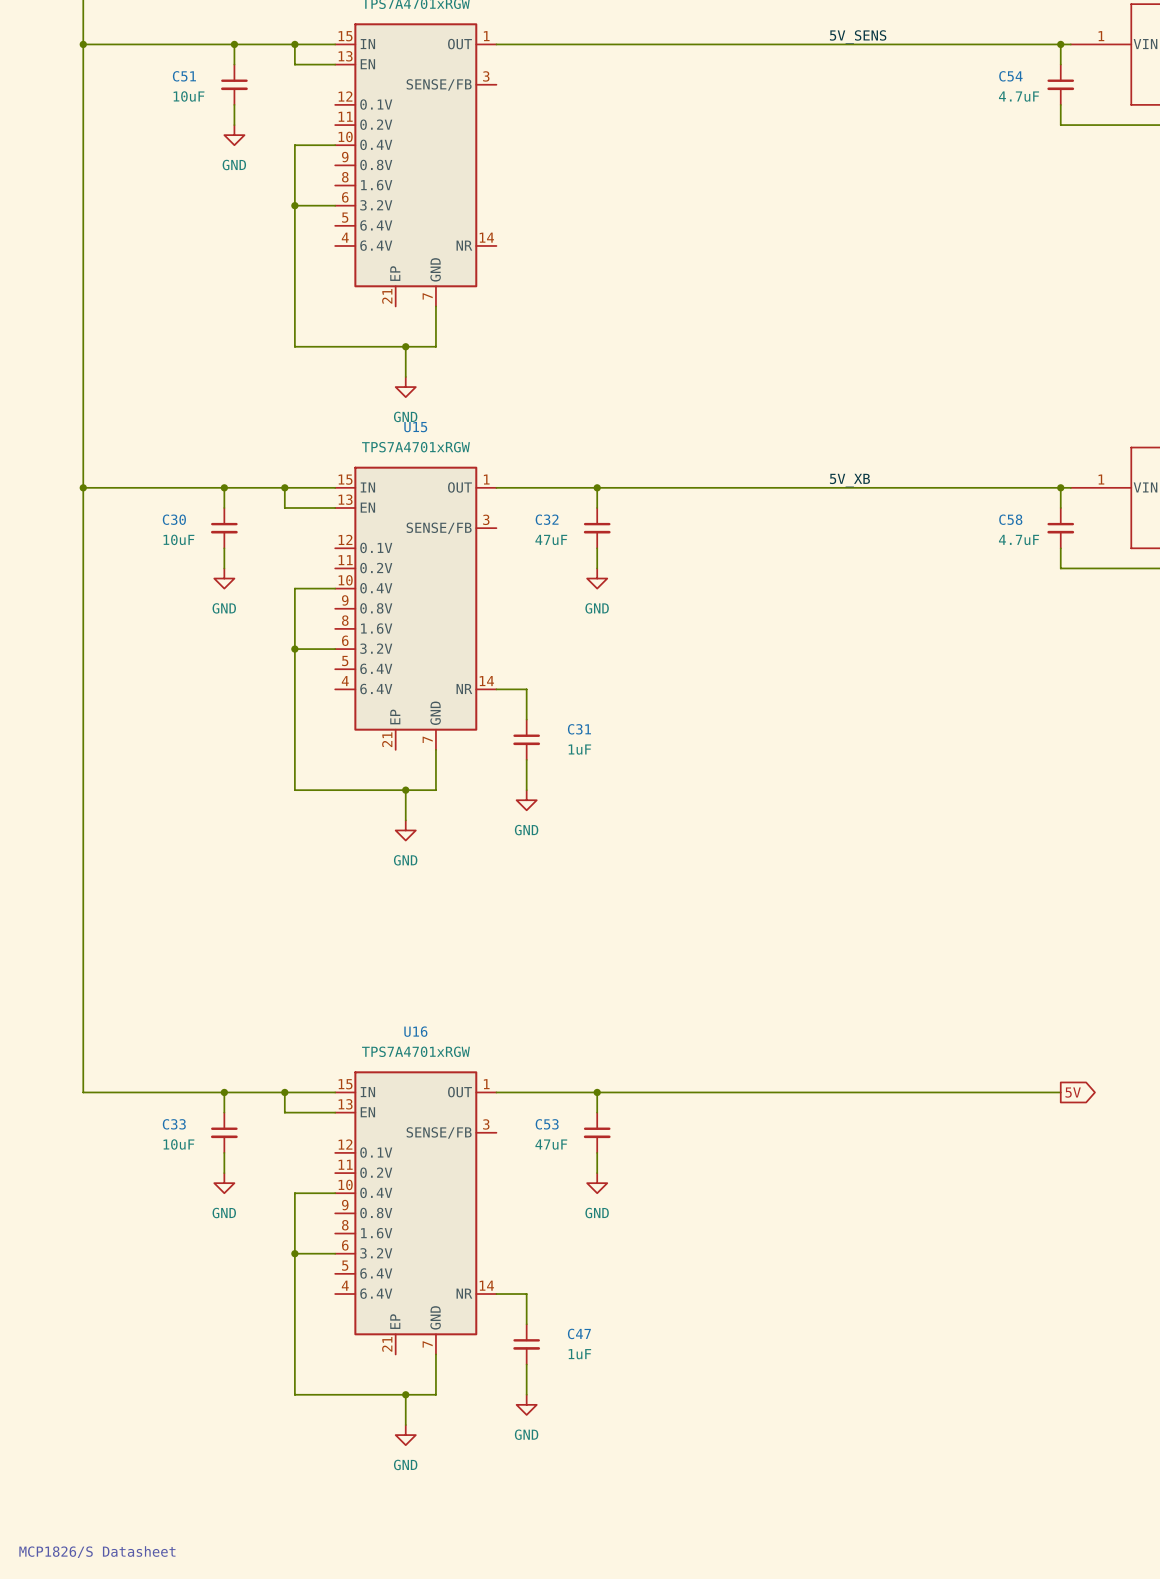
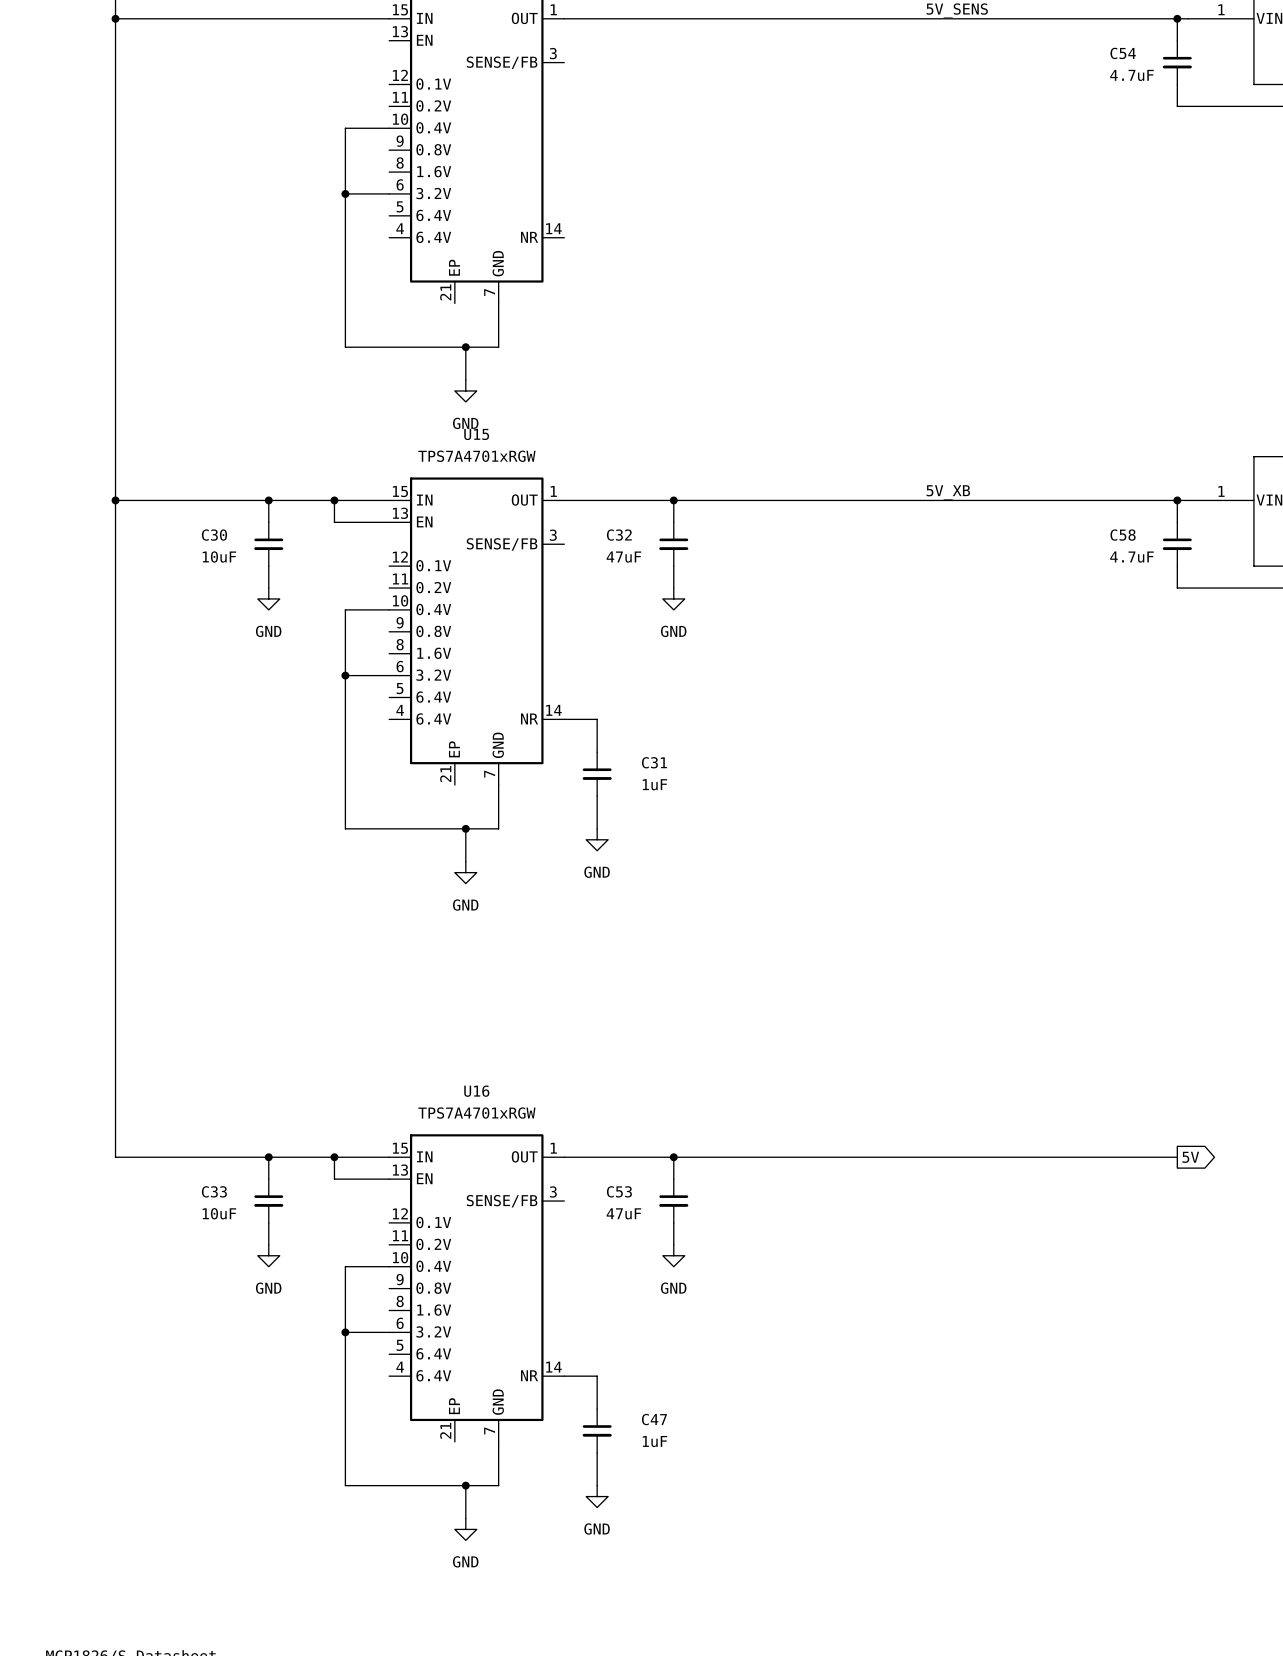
wire: (234, 44) (234, 64) -> none
junction: (234, 44) -> none
wire: (294, 44) (294, 64) (335, 64) -> none
junction: (294, 44) -> none
C51: 10uF (234, 84) -> none
wire: (234, 104) (234, 125) -> none
power symbol: GND (234, 135) -> none

